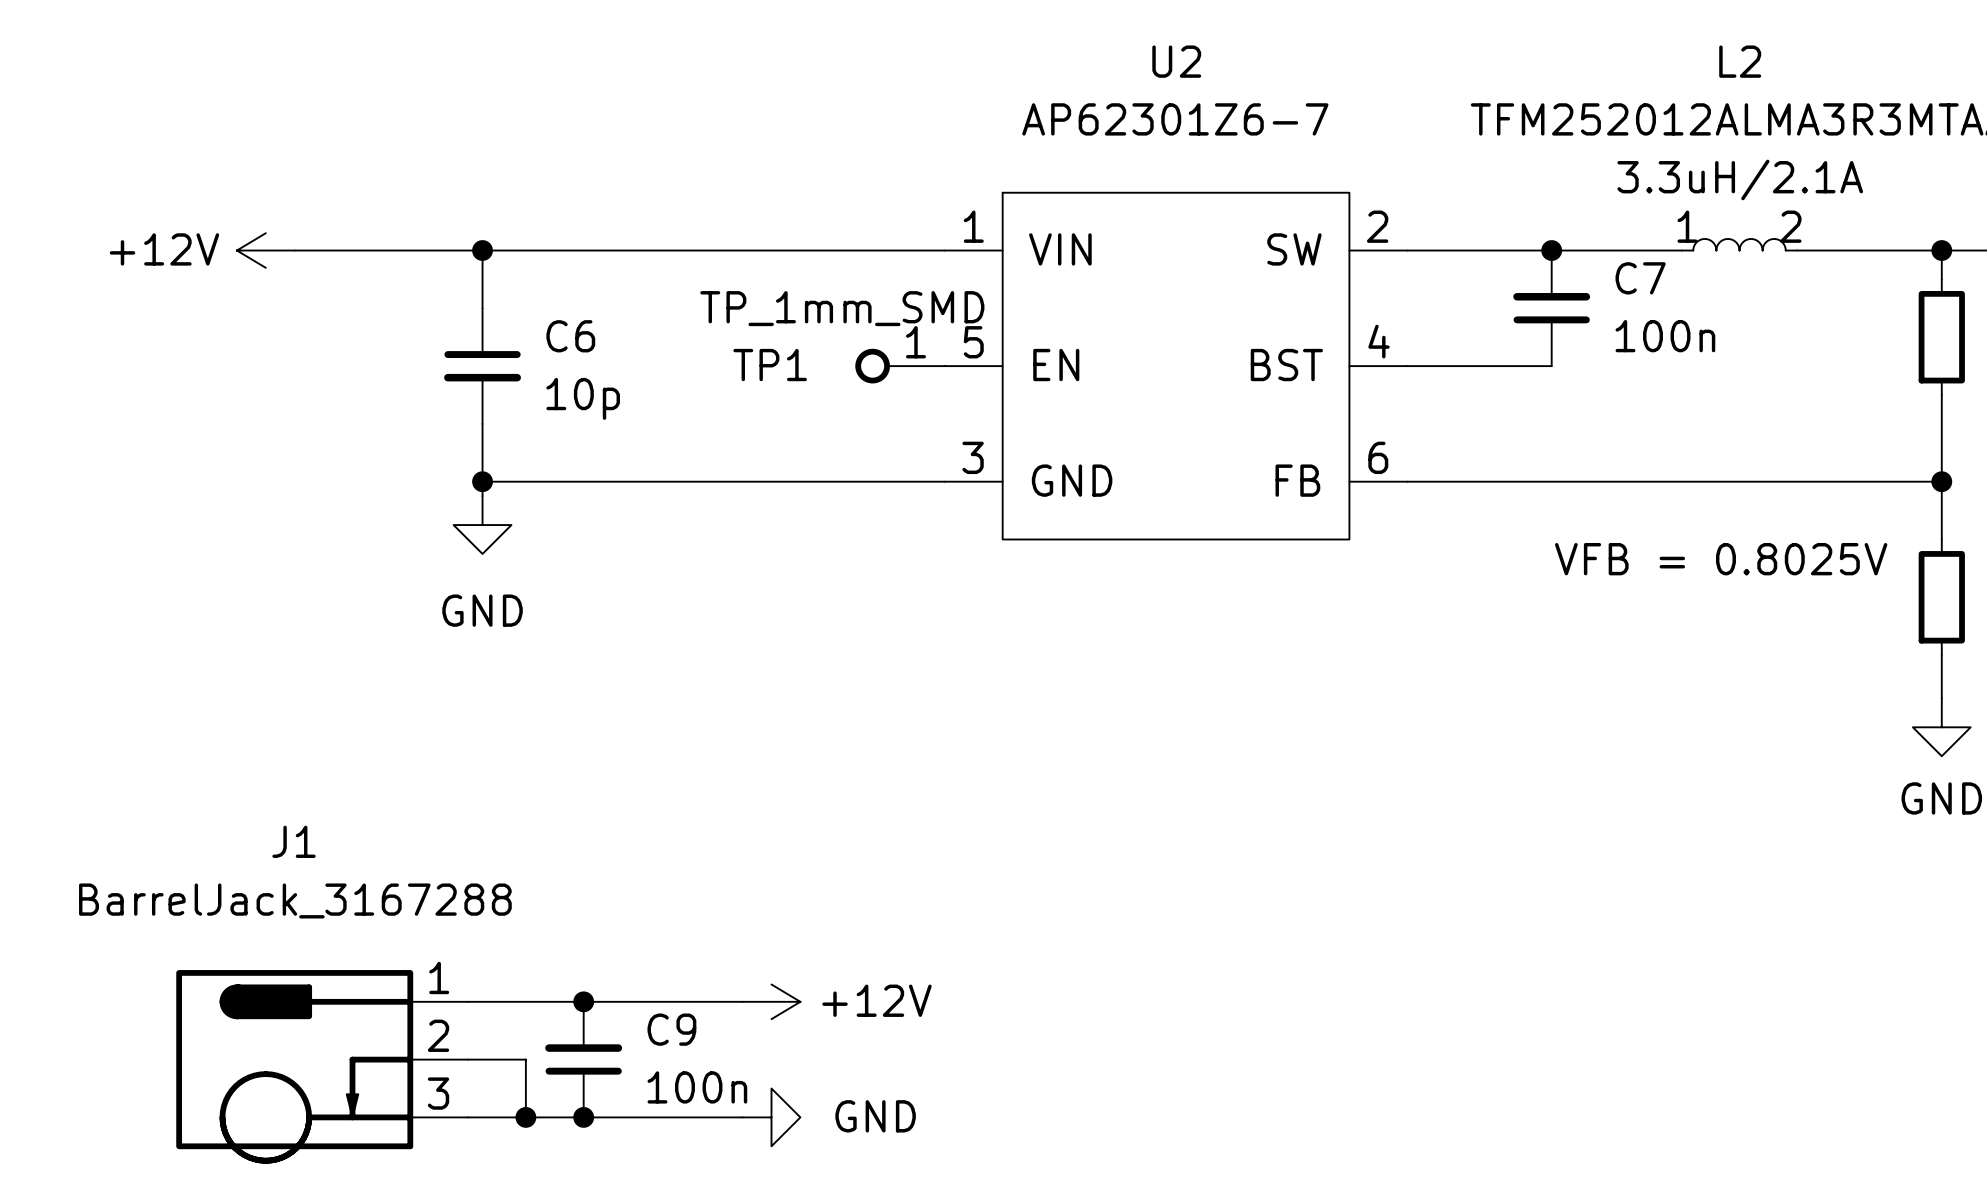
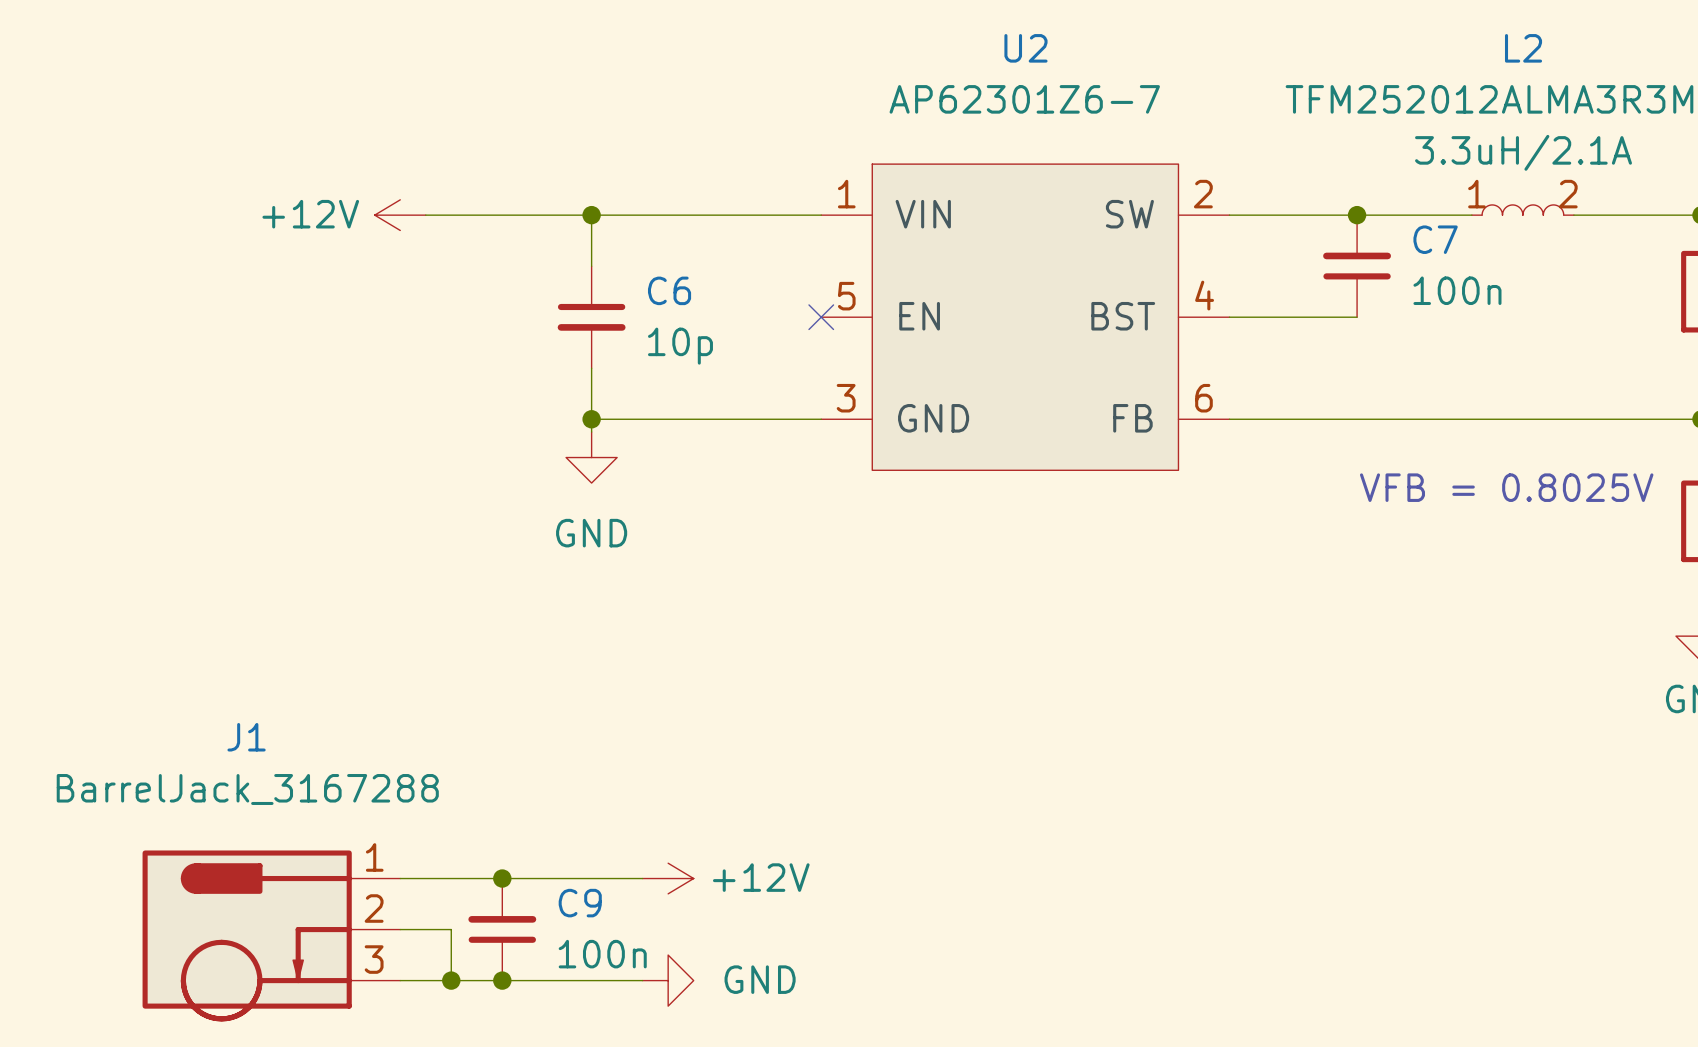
power symbol position: +12V (265, 250) -> +12V (400, 215)
wire: (294, 250) (496, 250) -> none
wire: (482, 250) (482, 308) -> (591, 215) (591, 266)
junction: (482, 250) -> none
junction: none -> (591, 215)
C6 position: (482, 366) -> (591, 317)
TP1: TP_1mm_SMD (900, 366) -> none
no-connect mark: none -> (821, 317)
wire: (482, 423) (482, 496) -> (591, 368) (591, 432)
wire: (482, 481) (684, 481) -> none
junction: (482, 481) -> none
junction: none -> (591, 419)
power symbol position: GND (482, 525) -> GND (591, 457)

